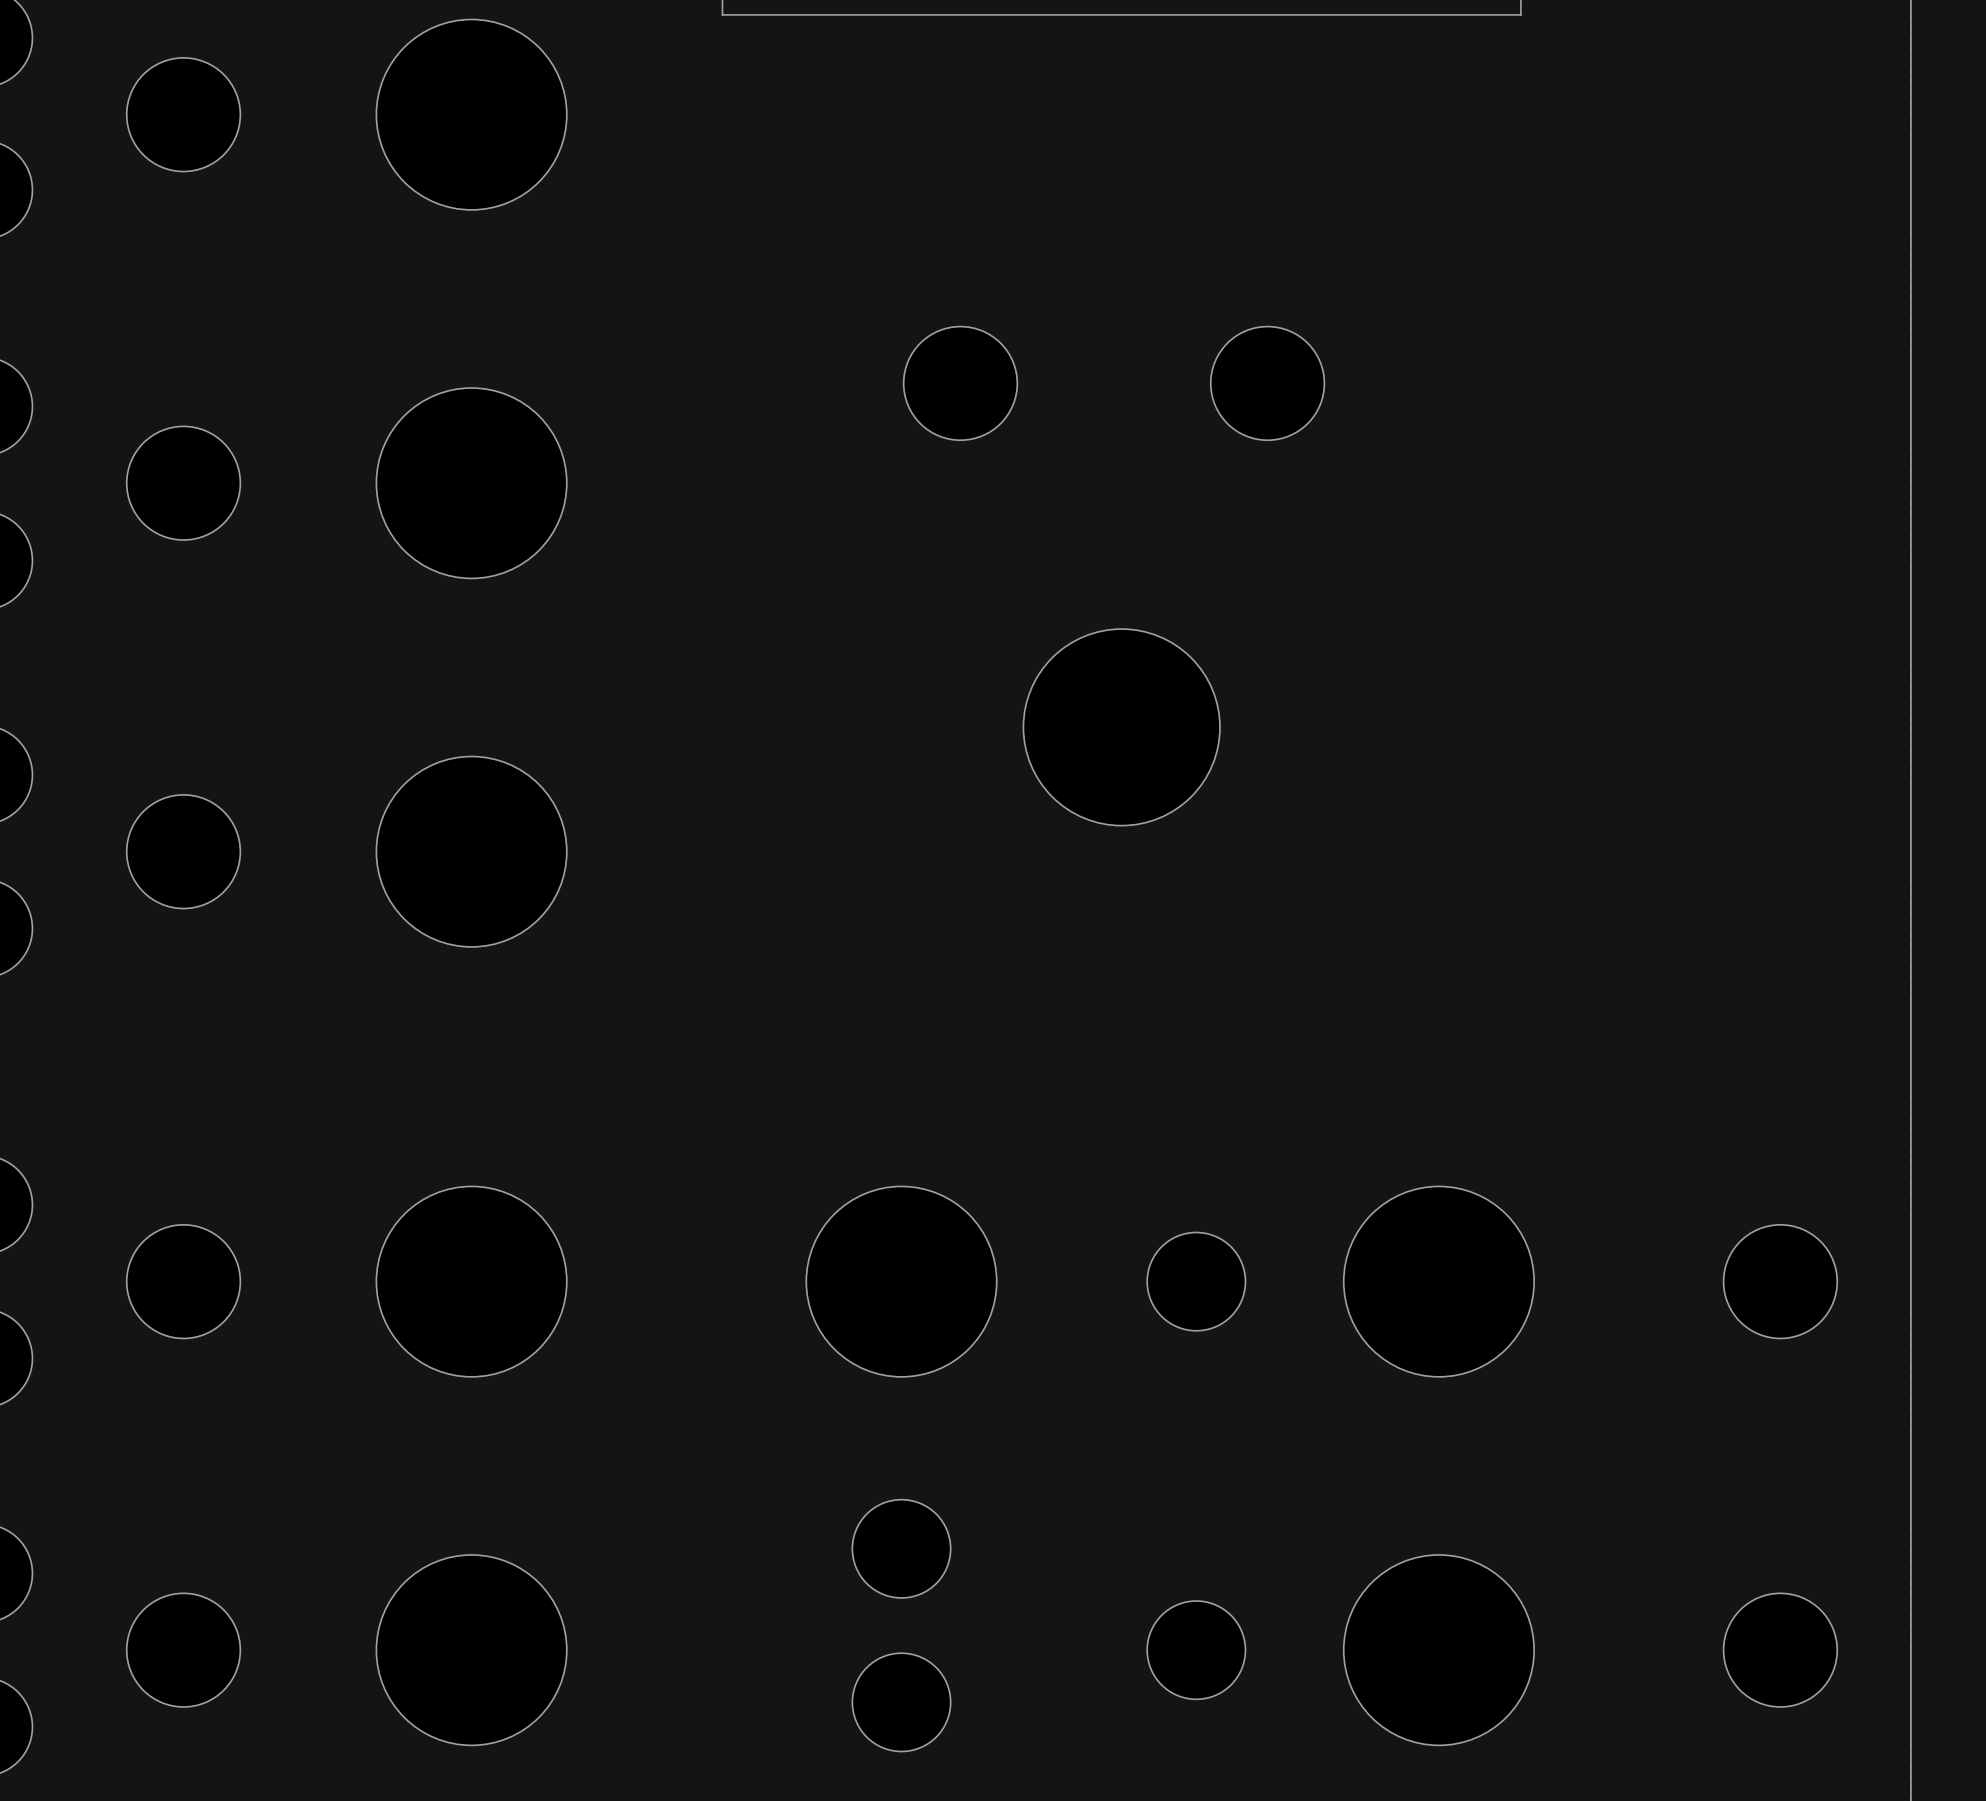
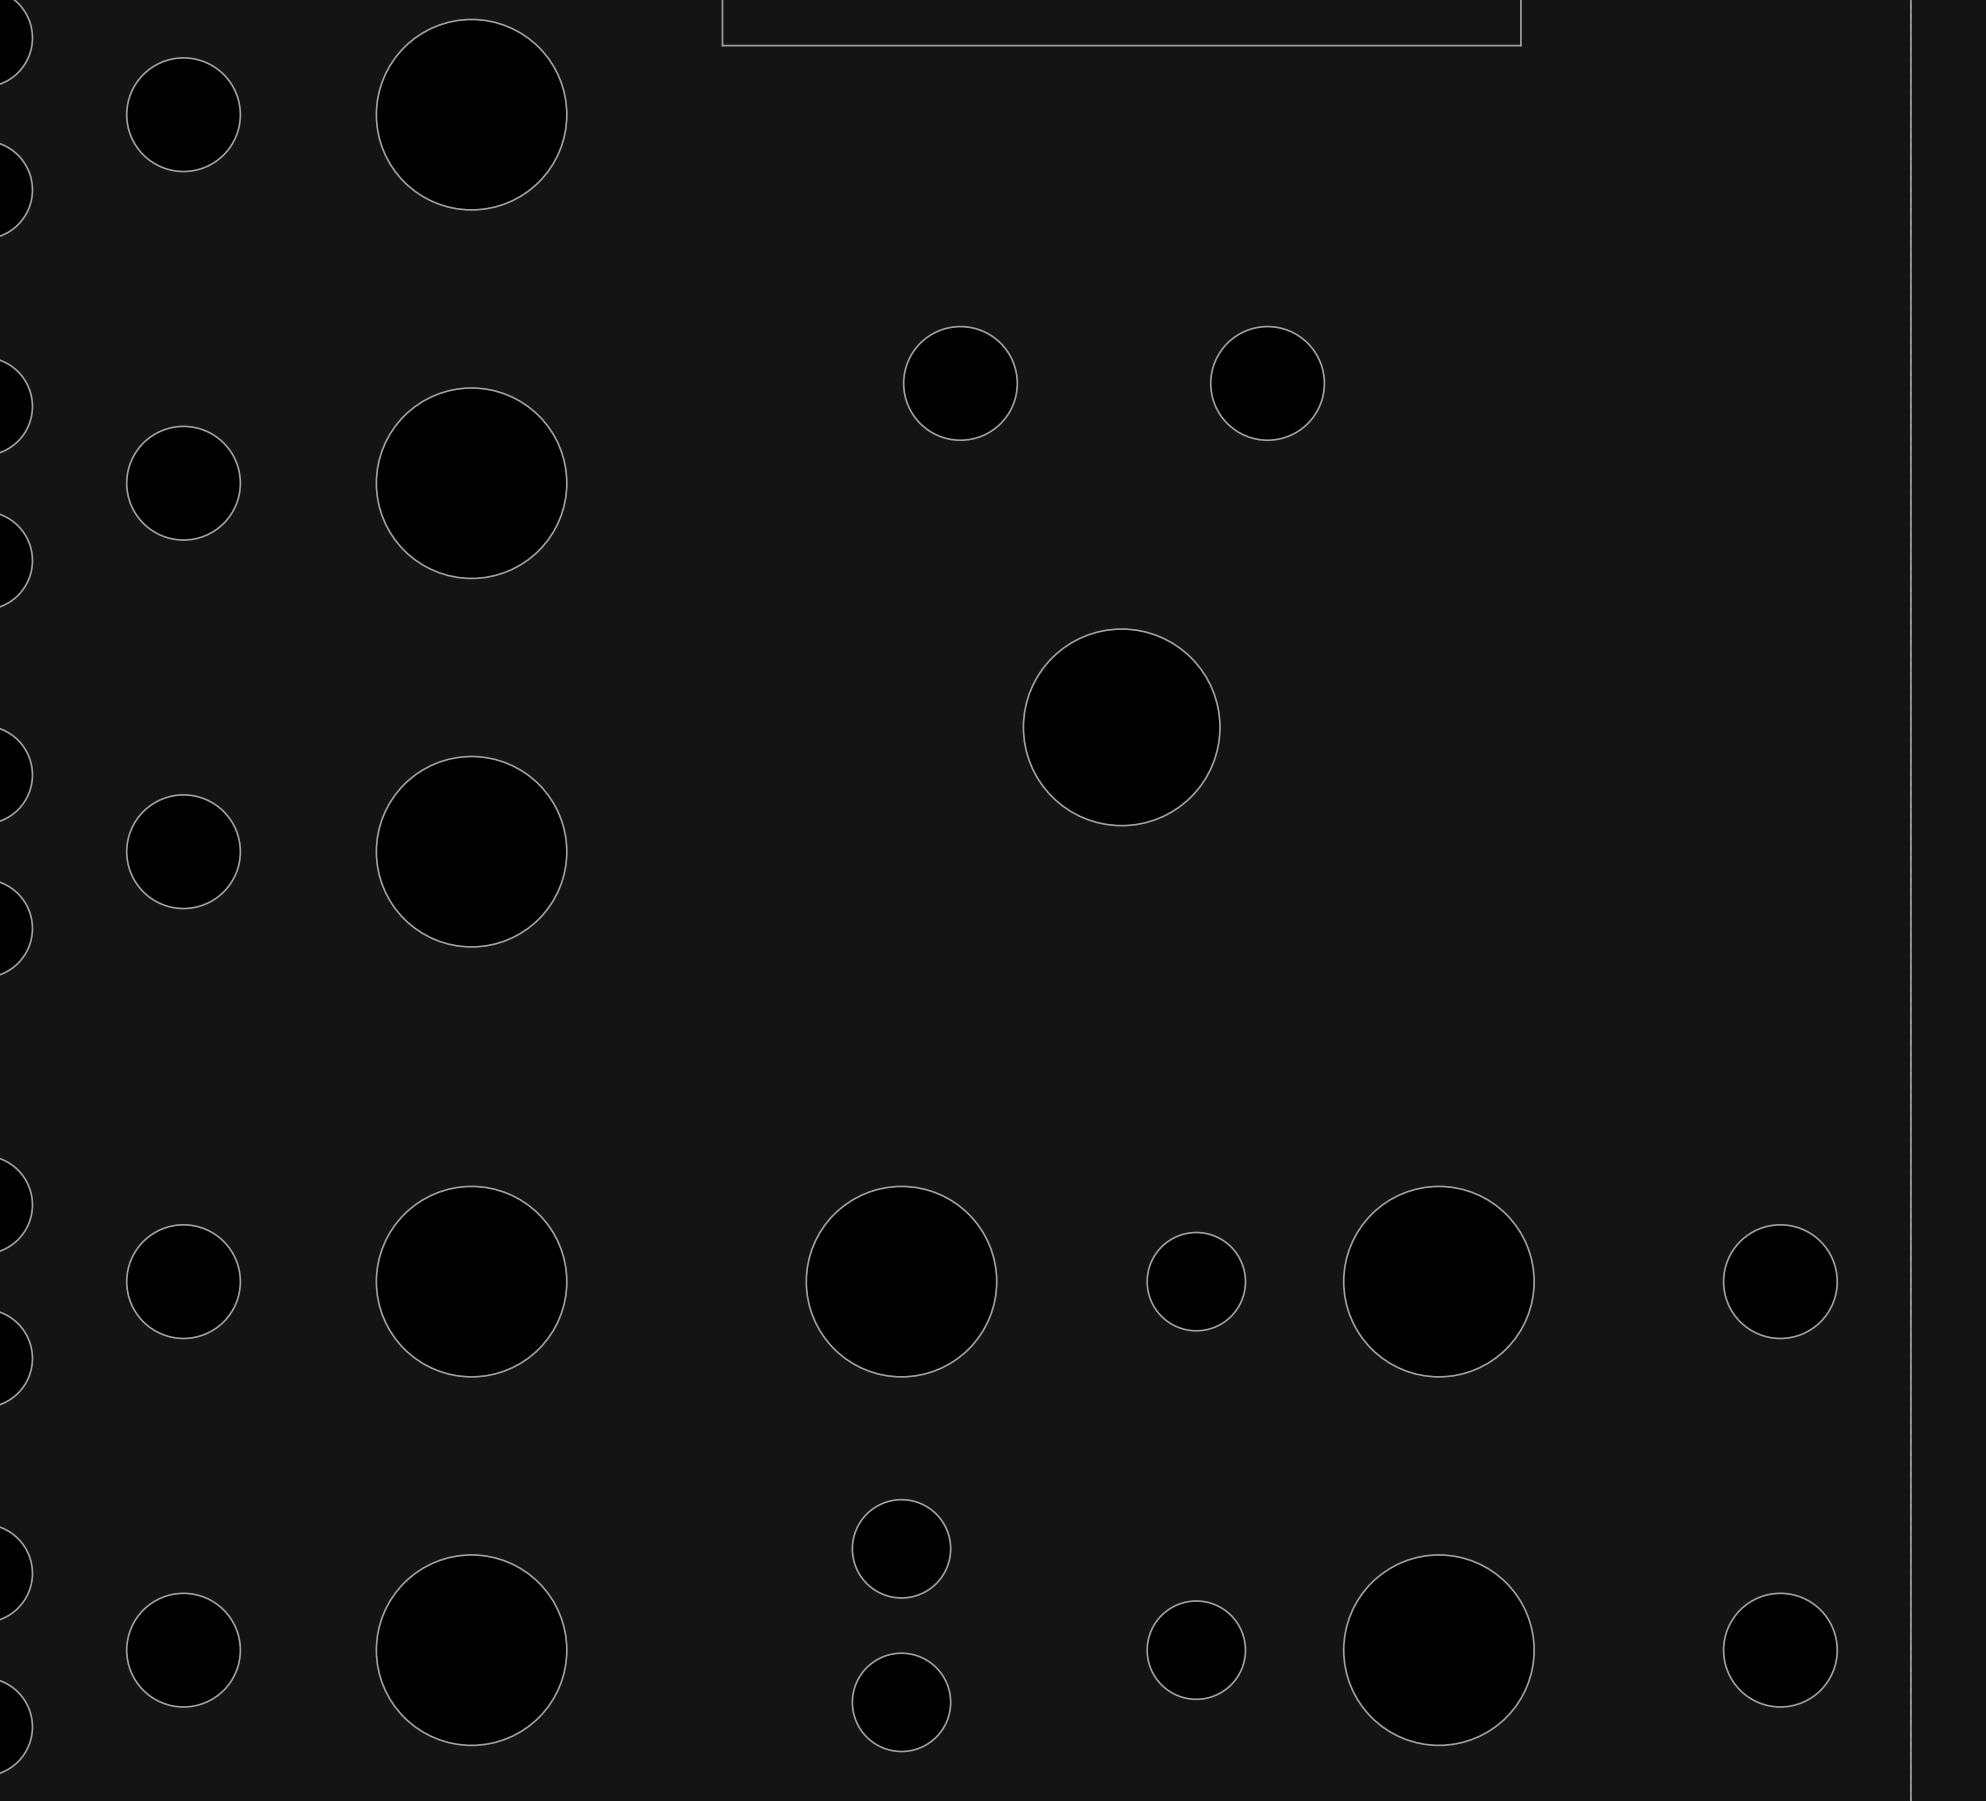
board edge: (1520, 14) (722, 14) -> (1520, 14) (1520, 45) (722, 45) (722, 14)

